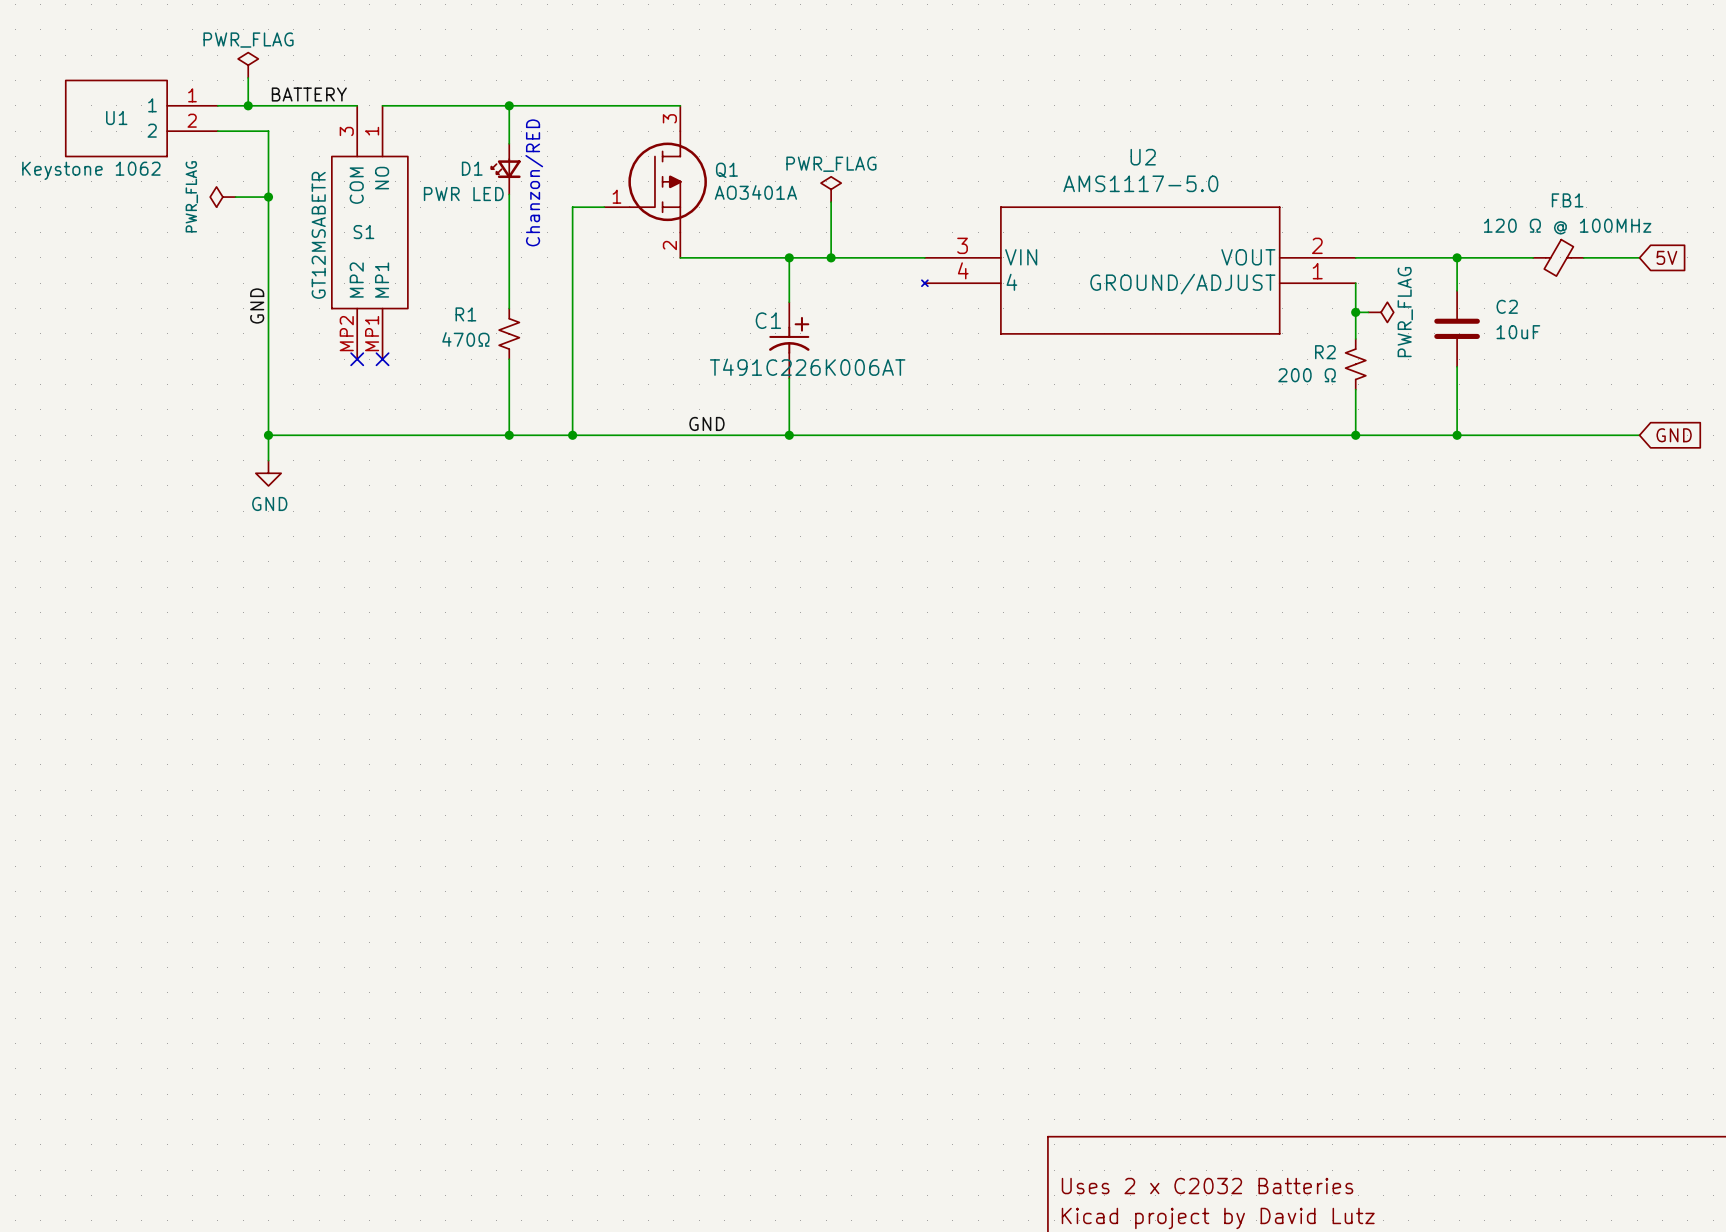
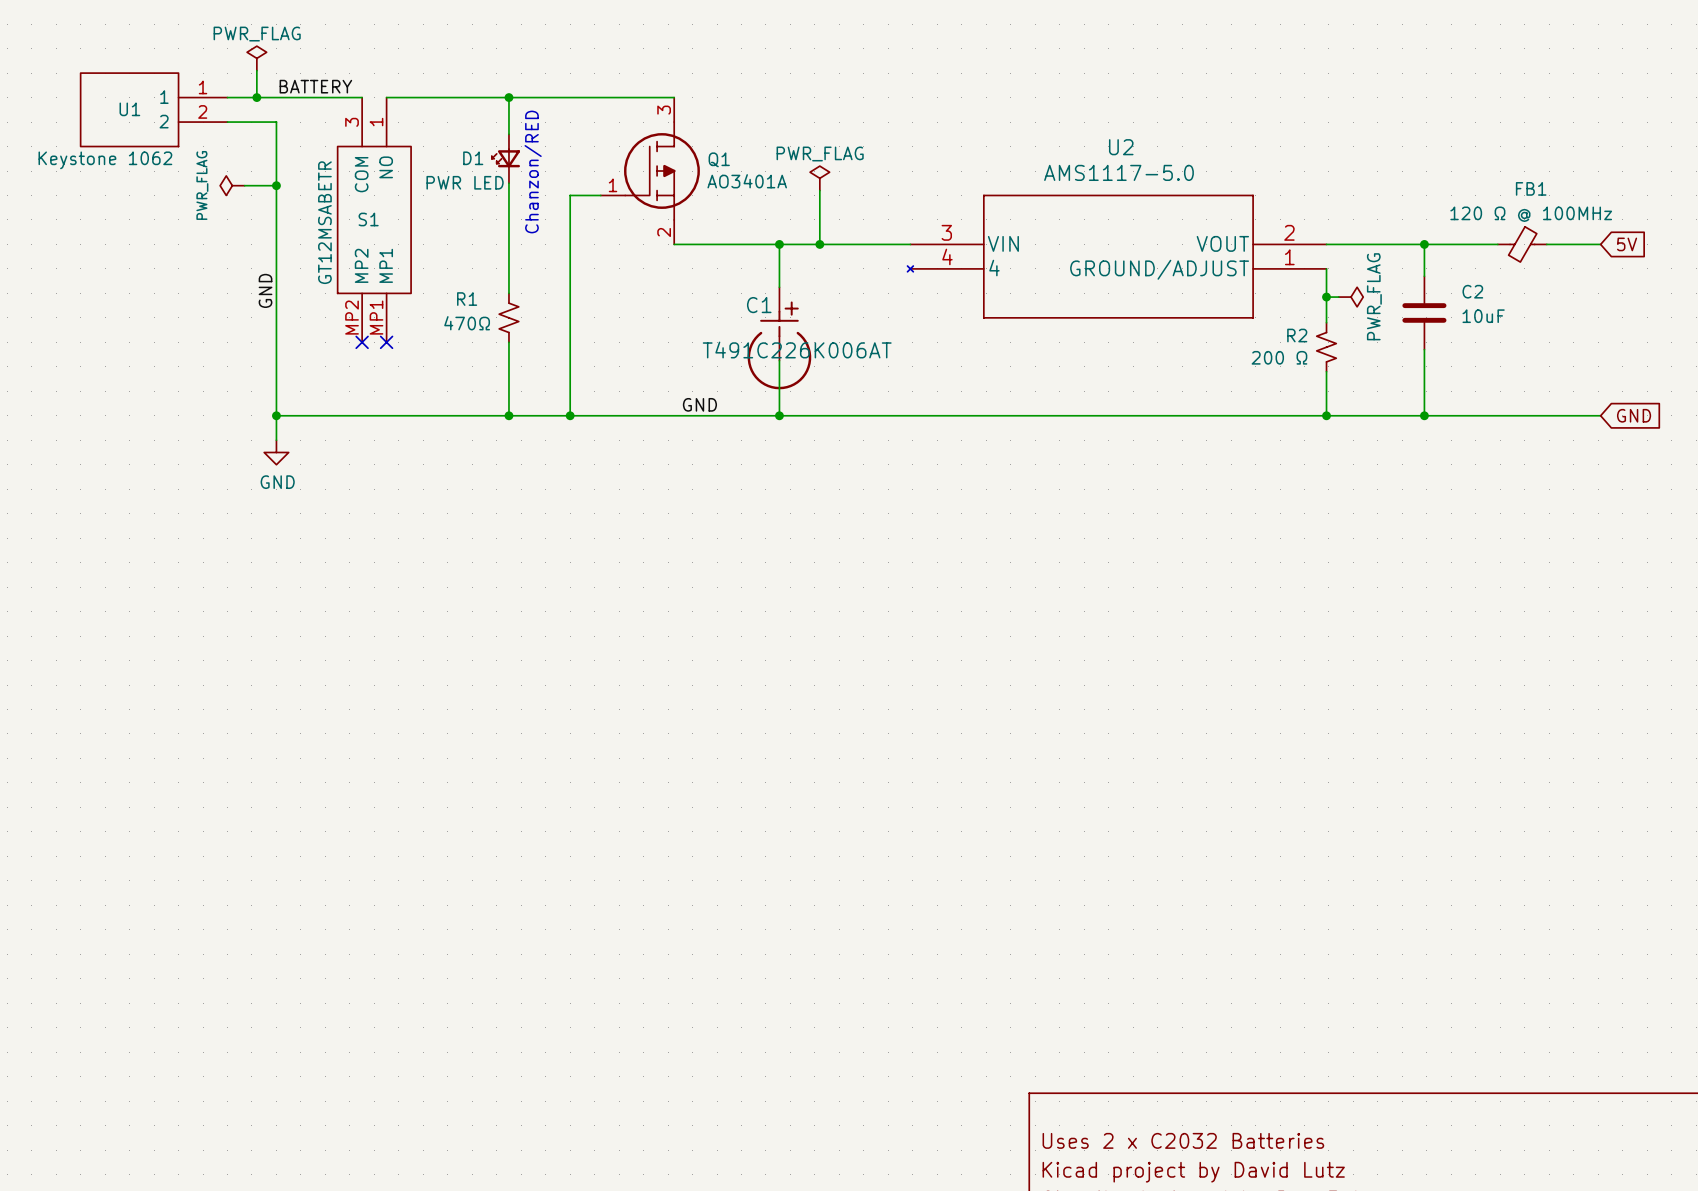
C1 symbol: [769, 302, 810, 379] -> [747, 287, 812, 390]

